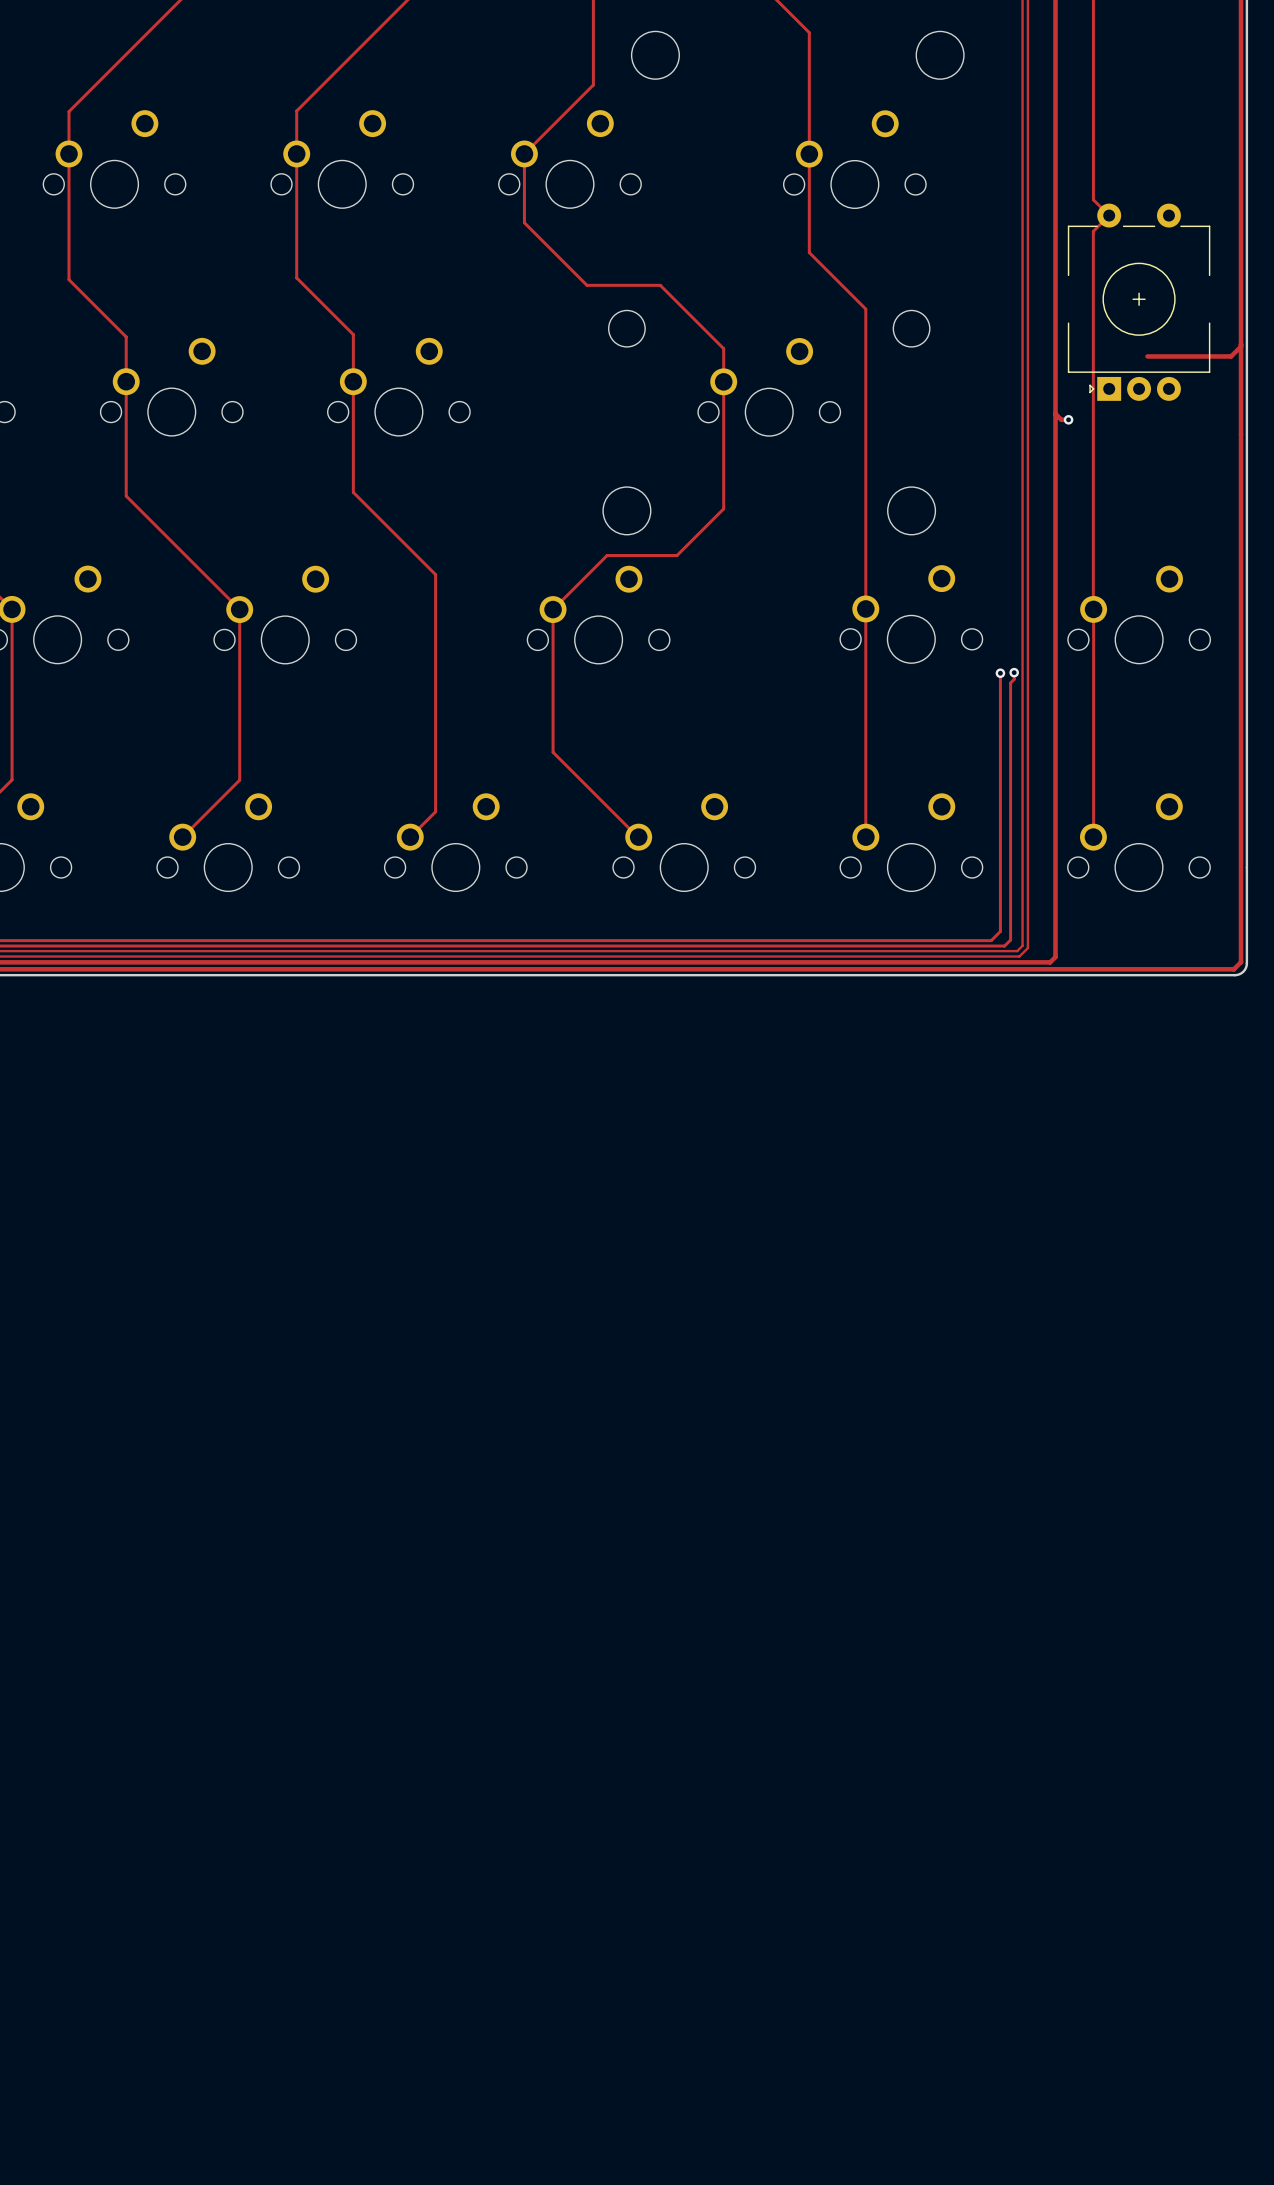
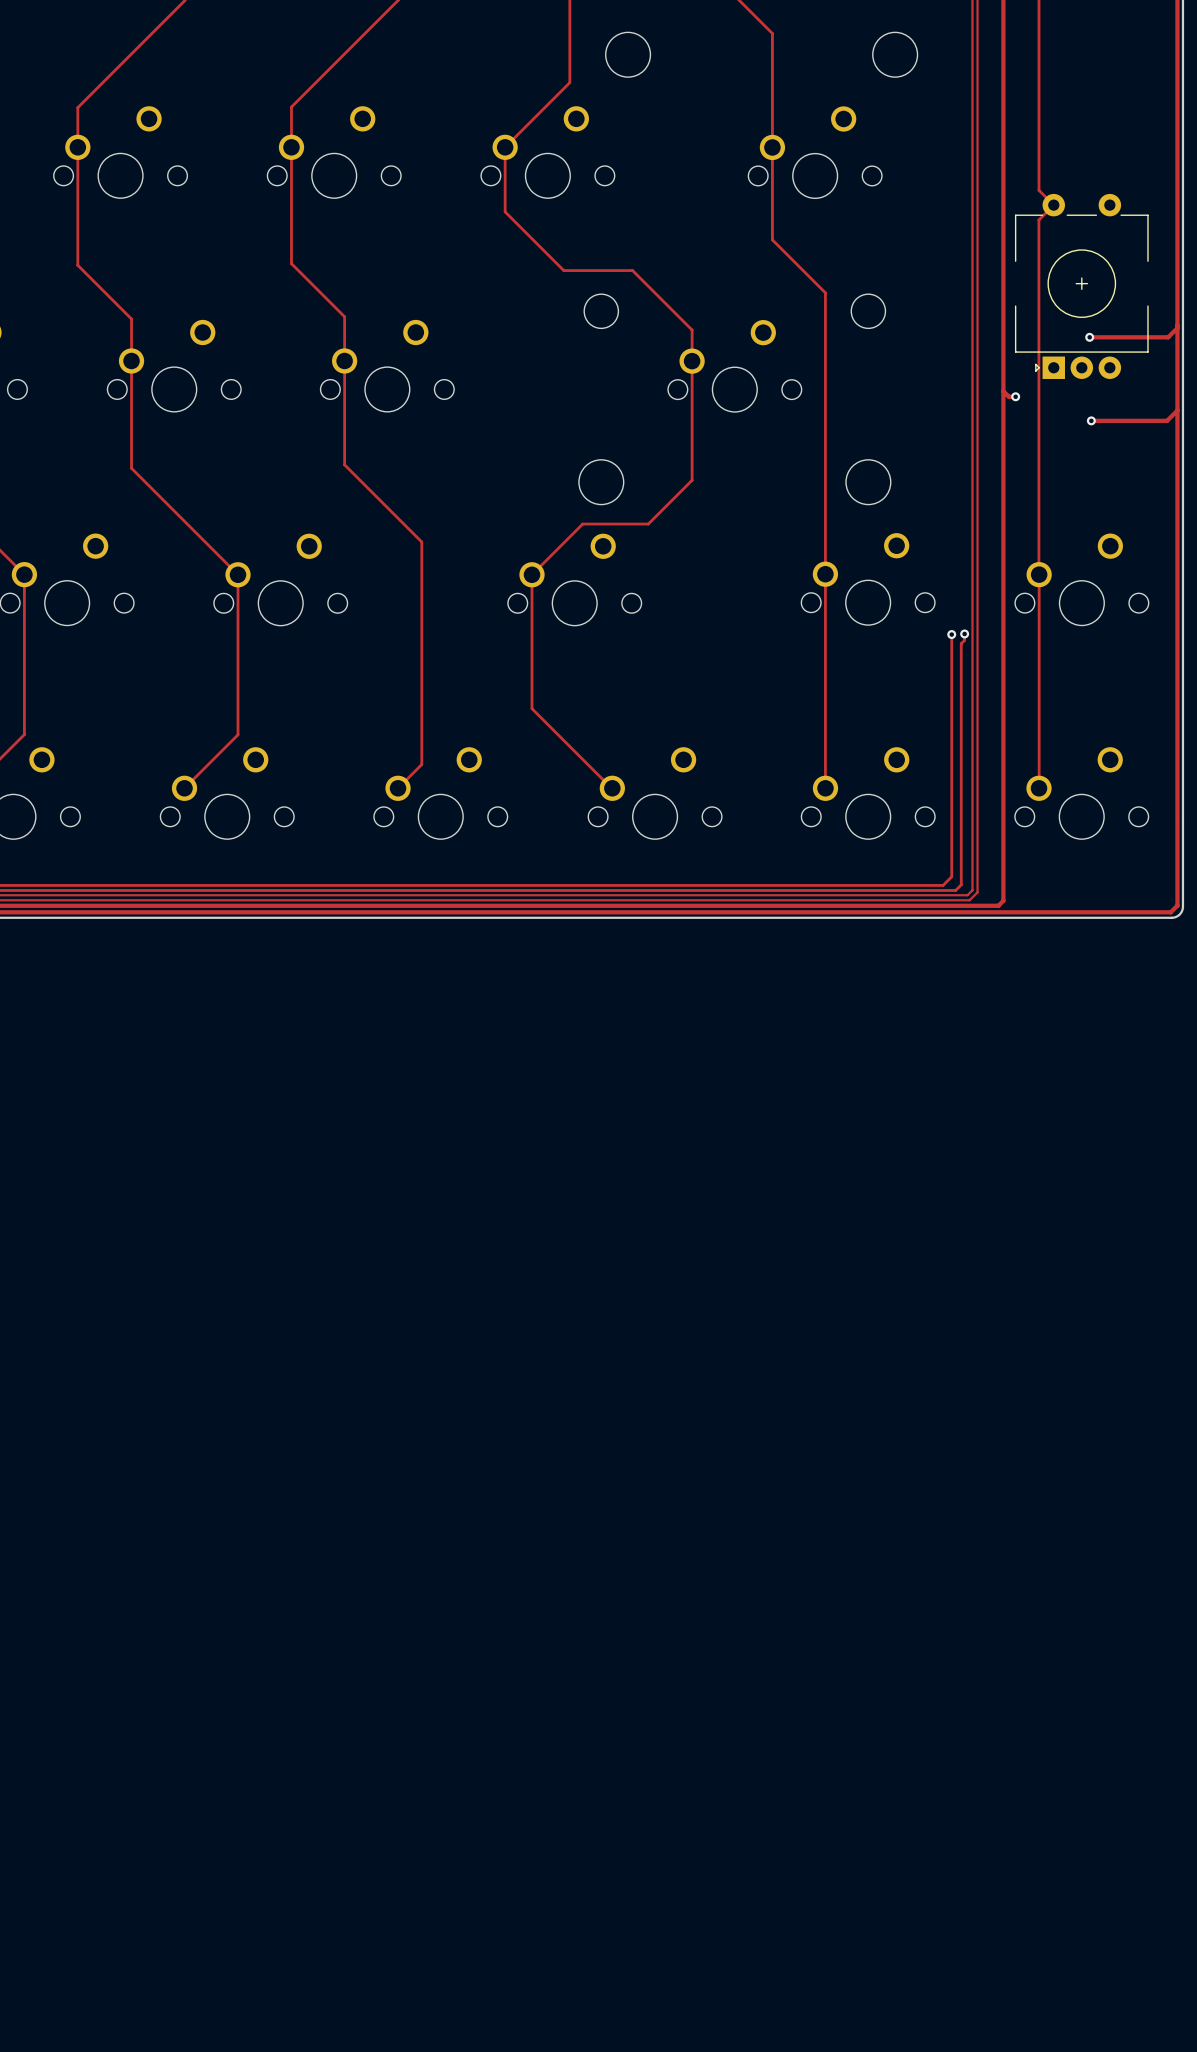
via: none -> (1089, 337)
track: none -> (1177, 410) (1167, 420) (1091, 420)
via: none -> (1091, 420)

